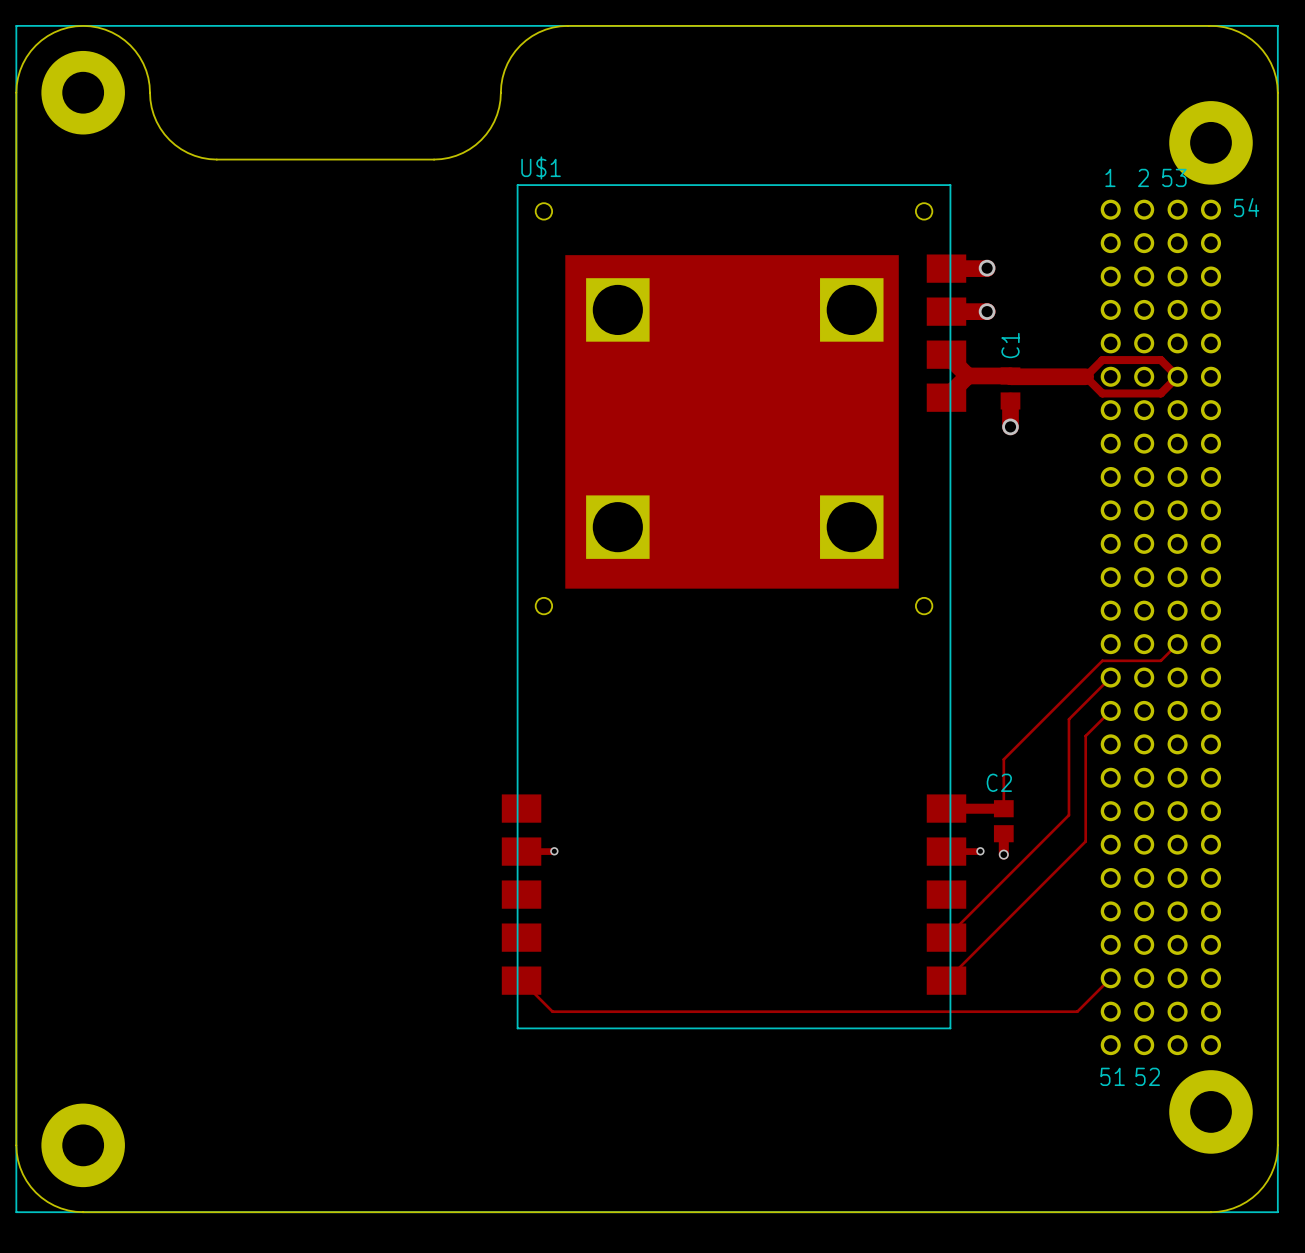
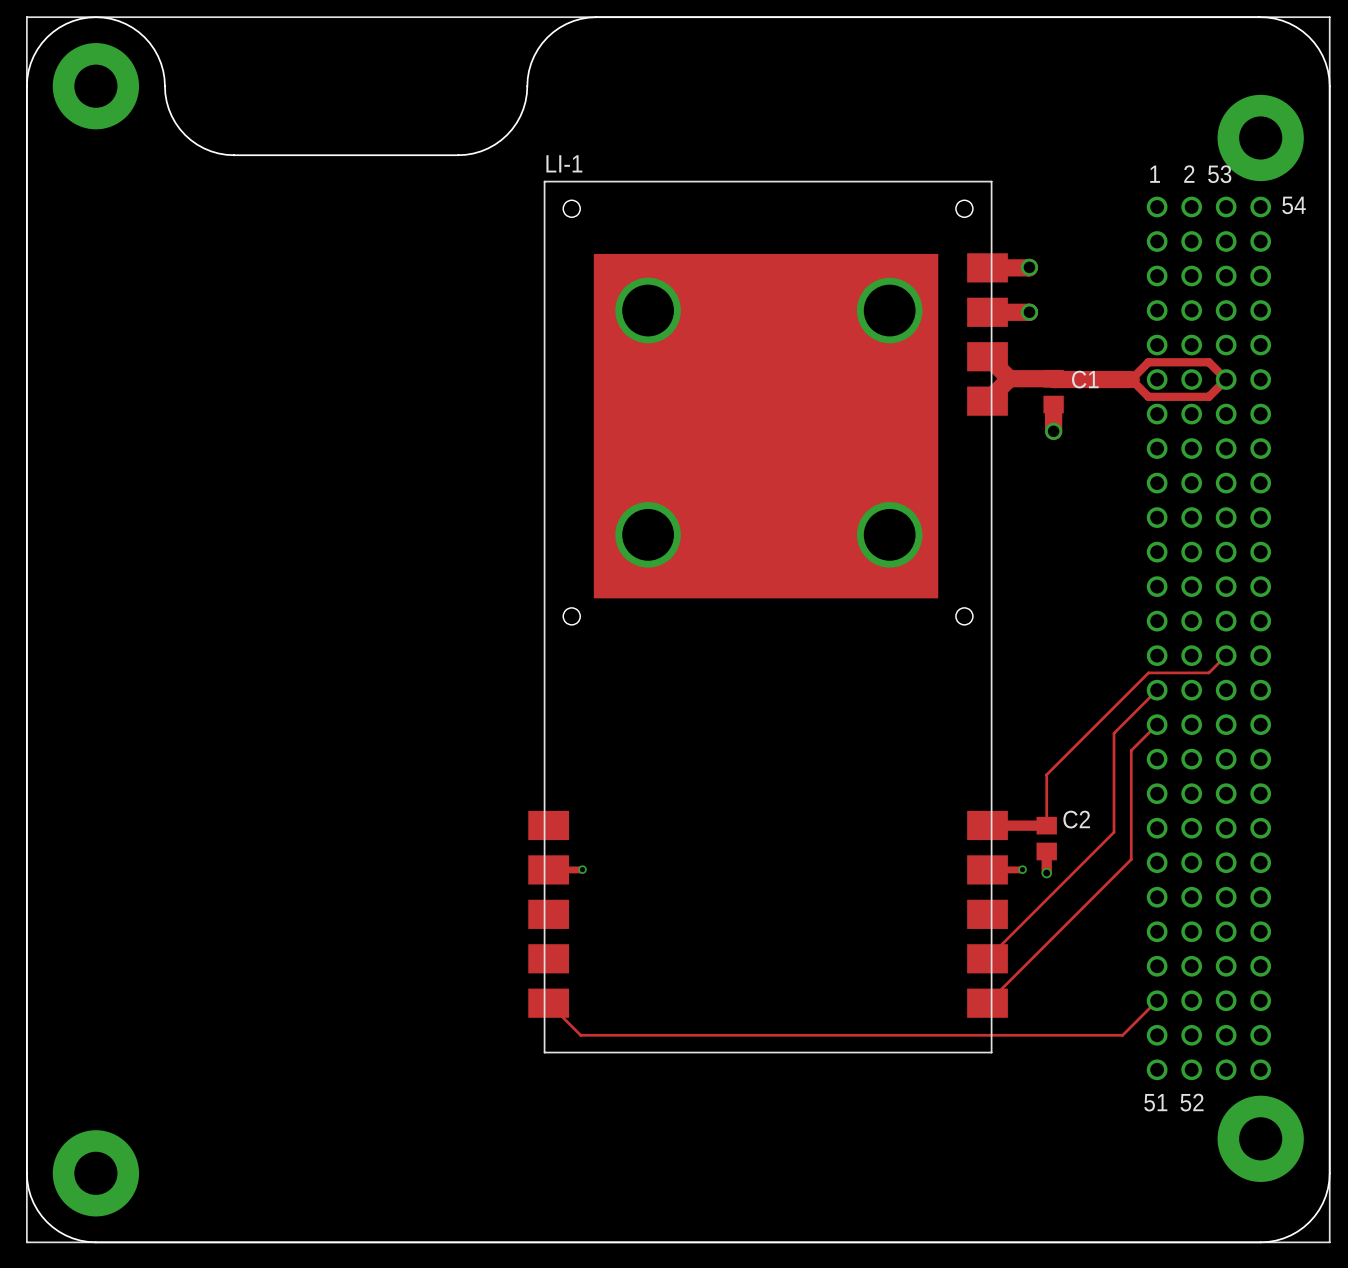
C1 name rotation: 0° (1010, 345) -> 90° clockwise (1085, 379)
C1 name position: C1 (1010, 345) -> C1 (1085, 379)
U$1: (734, 606) -> none
LI-1: none -> (768, 617)
C2 name position: C2 (999, 782) -> C2 (1076, 819)

